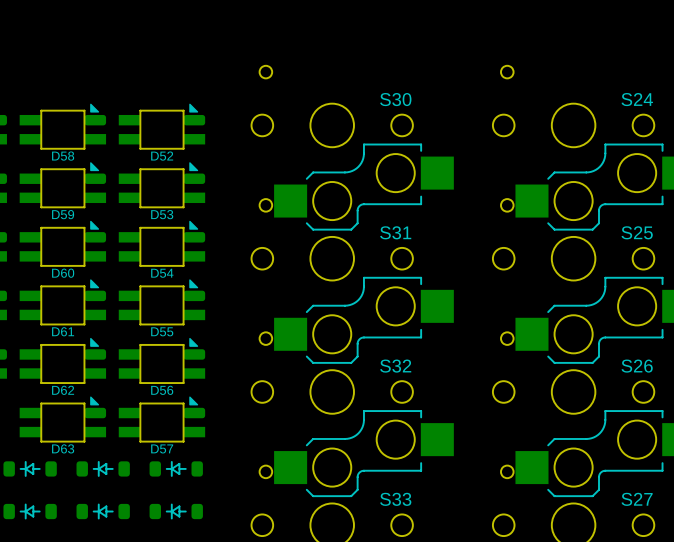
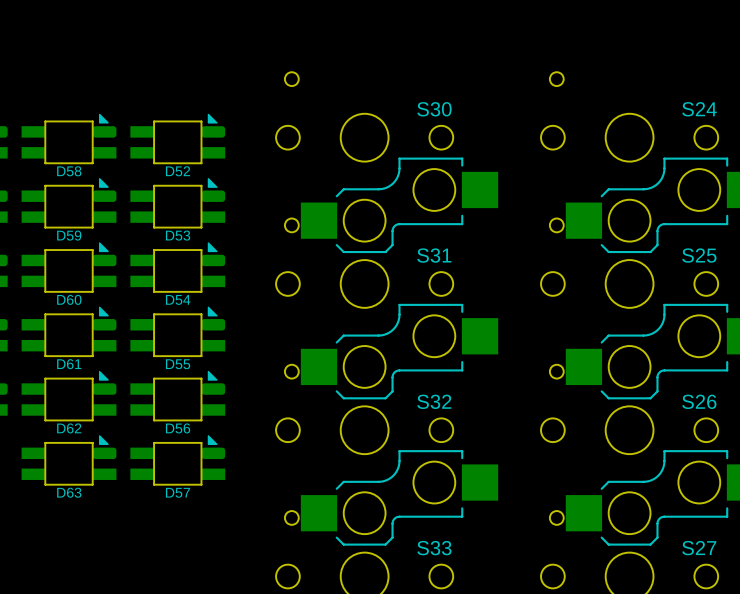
part: (30, 468) -> none
part: (103, 468) -> none
part: (176, 468) -> none
part: (30, 511) -> none
part: (103, 511) -> none
part: (176, 511) -> none

